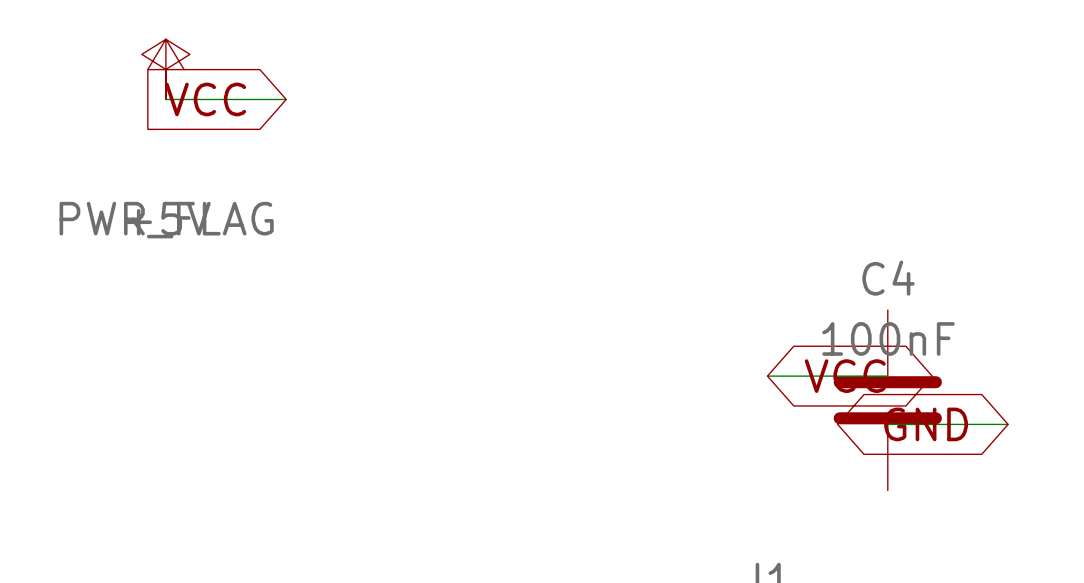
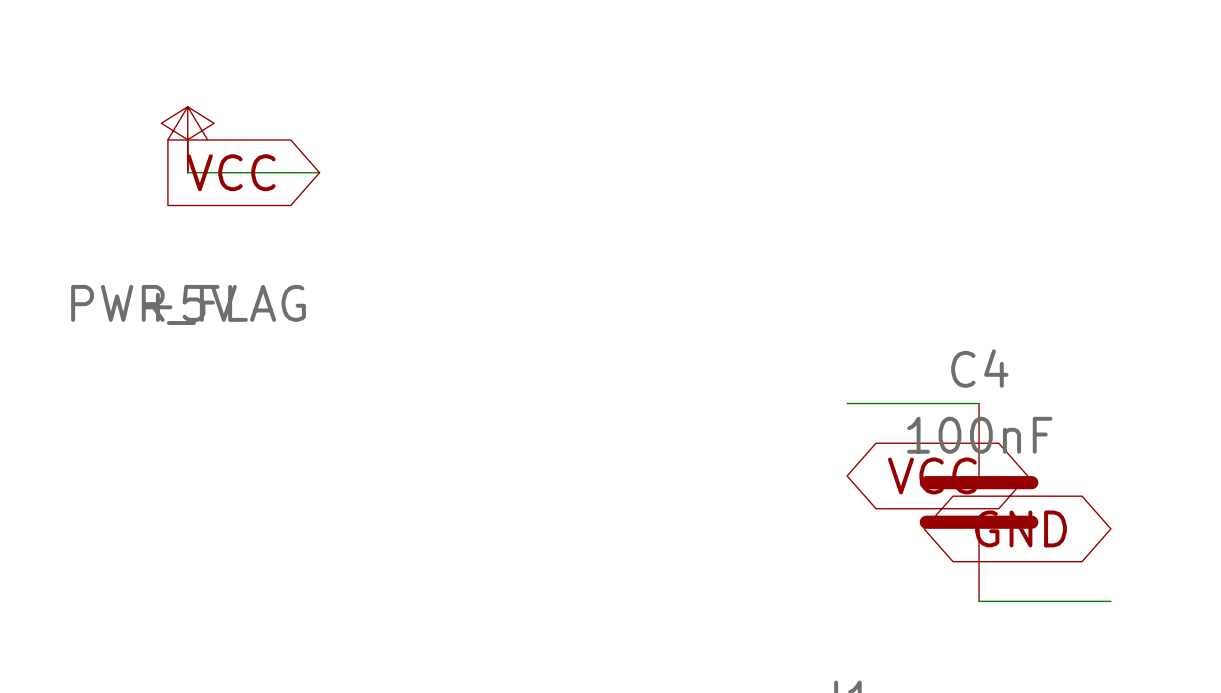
wire: (767, 376) (887, 376) -> (847, 403) (979, 403)
wire: (887, 424) (1008, 424) -> (979, 601) (1110, 601)

